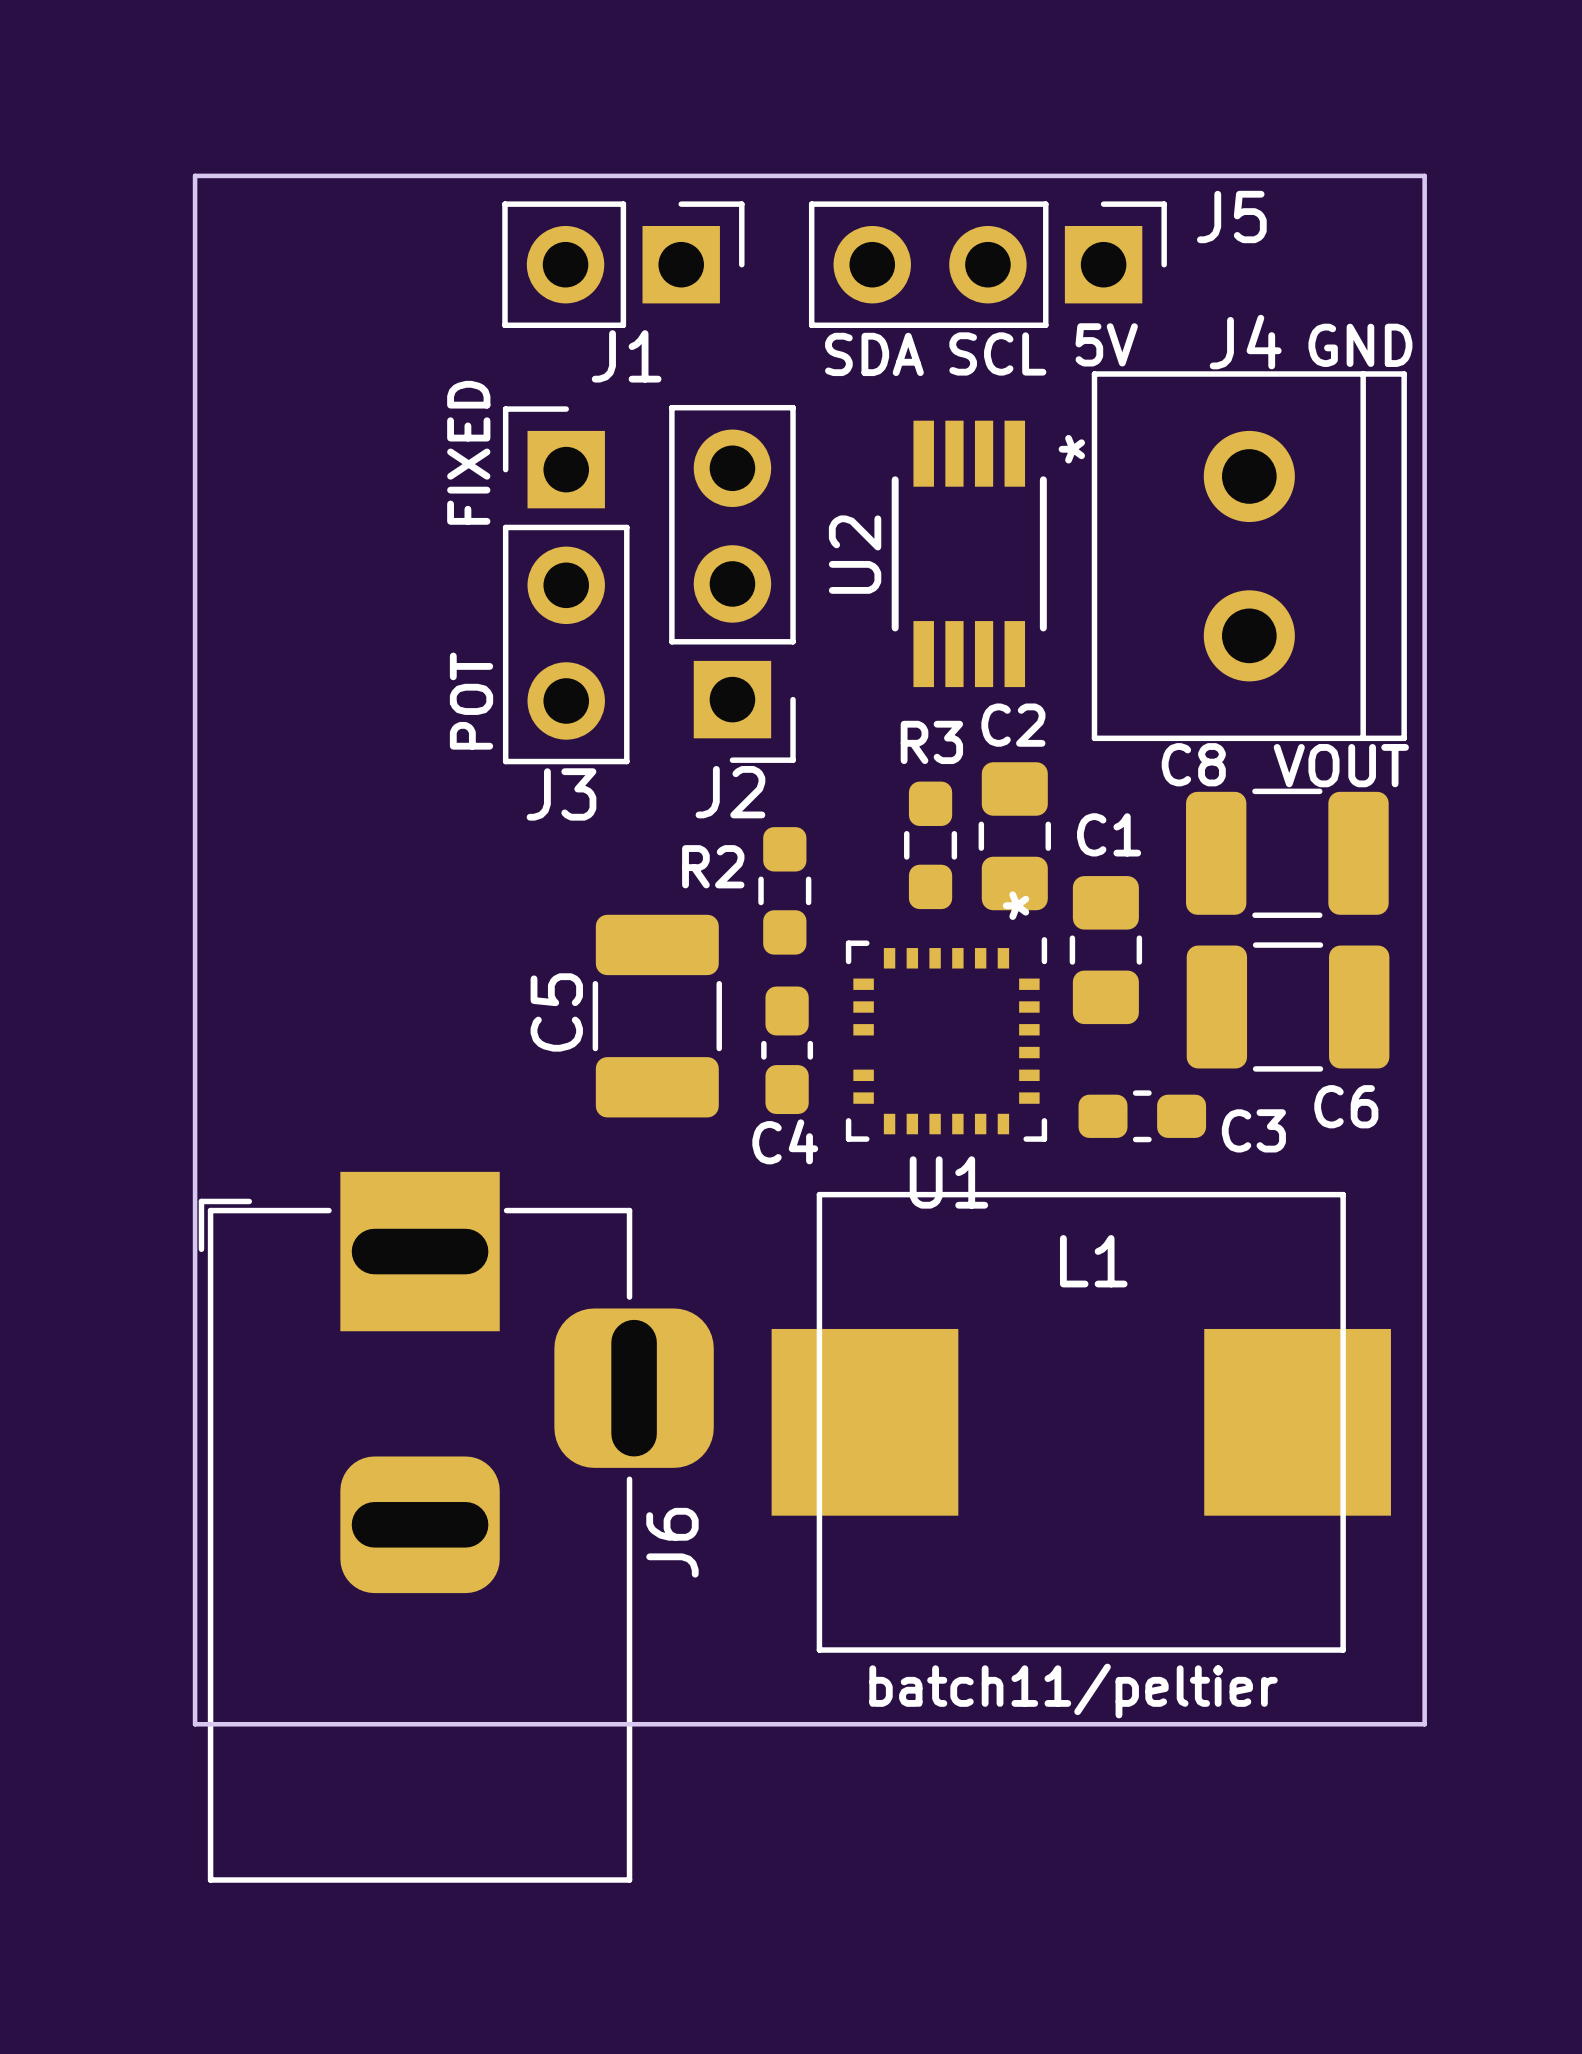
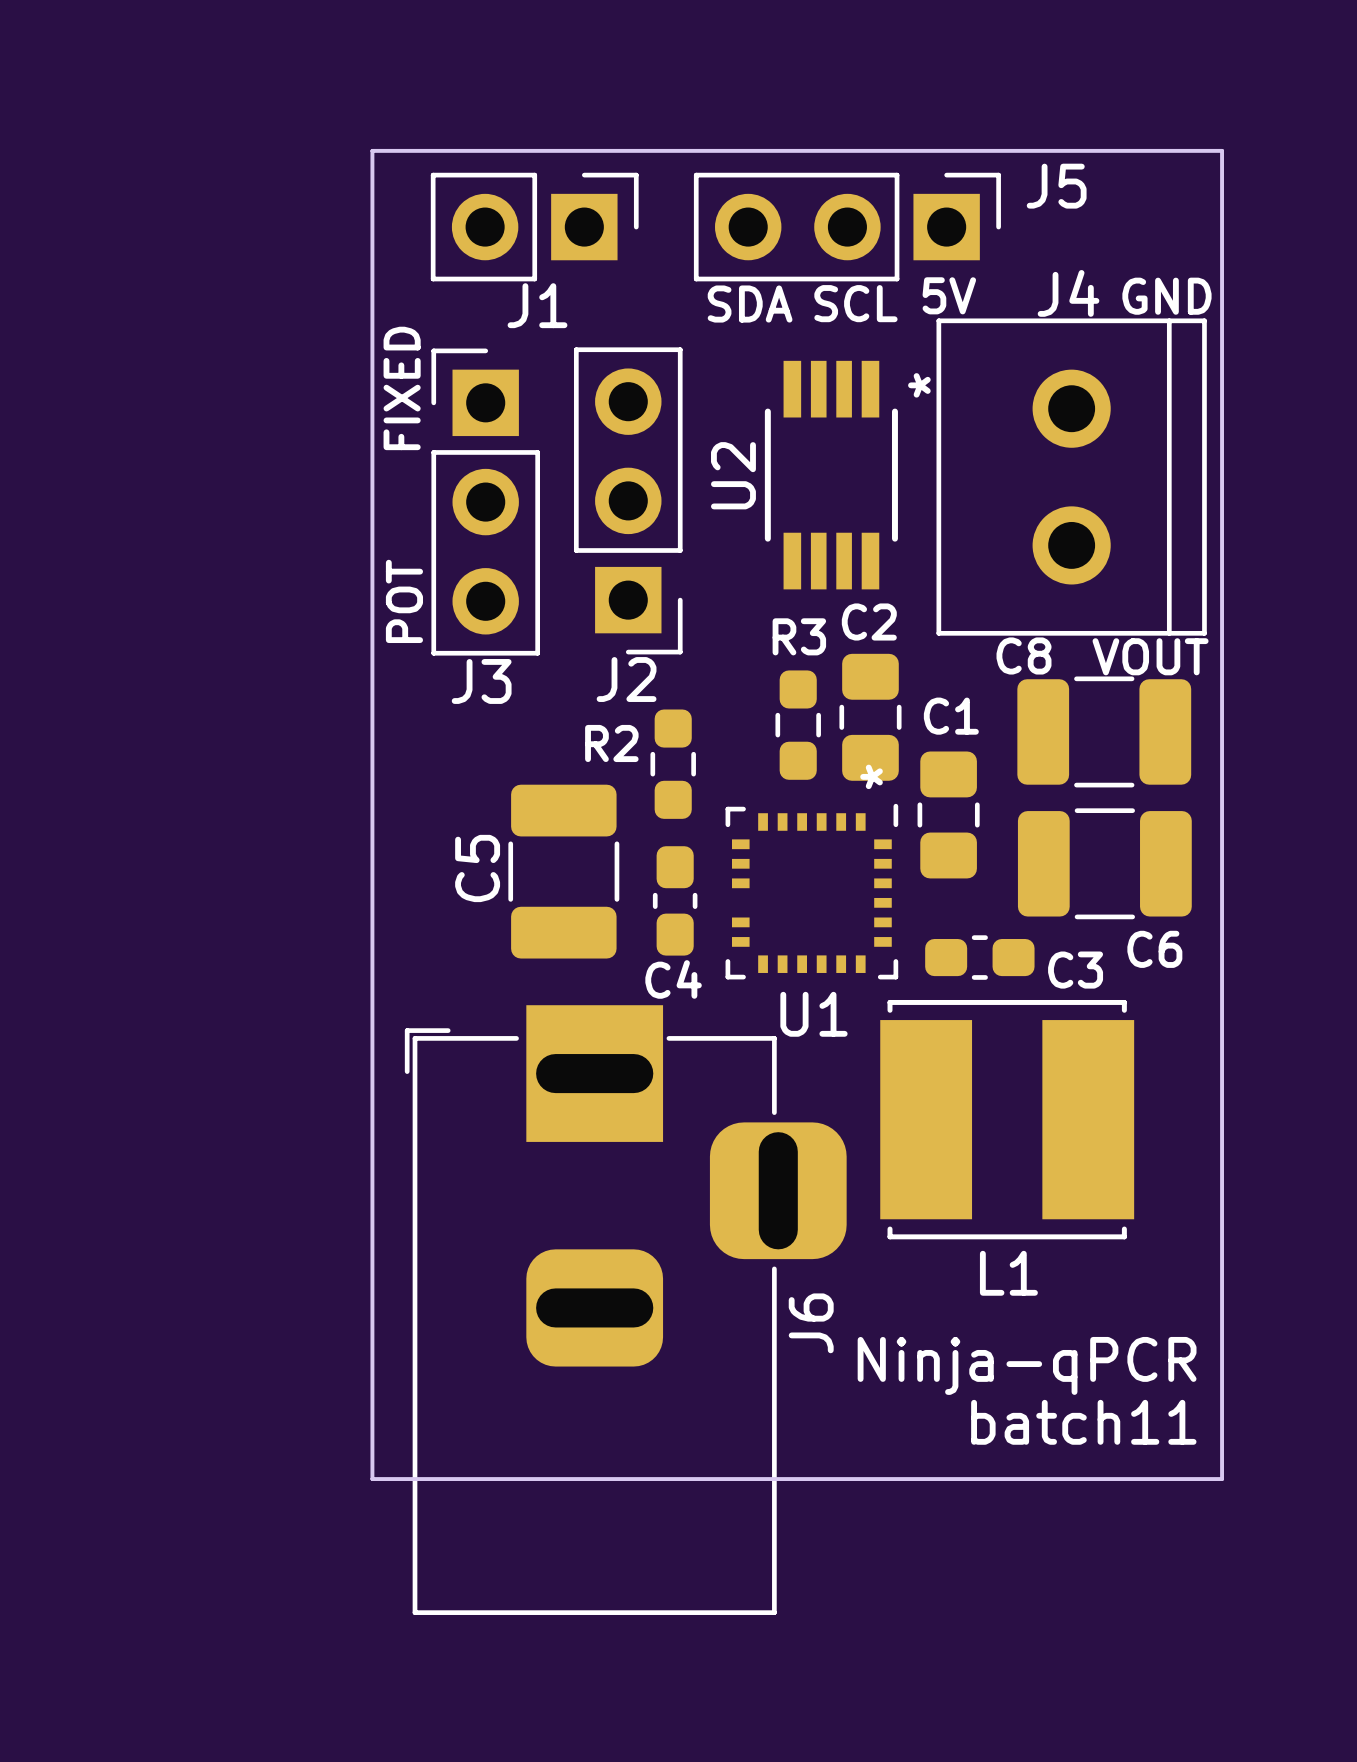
board edge: (434, 175) (195, 175) (195, 1724) (434, 1724) -> (372, 150) (372, 1479)
L1 footprint: [771, 1191, 1391, 1653] -> [880, 999, 1135, 1240]
L1 name position: L1 (1093, 1261) -> L1 (1008, 1273)
J6 position: (456, 1527) -> (625, 1310)
text: none -> Ninja-qPCR (1027, 1365)
text: batch11/peltier (1073, 1691) -> batch11 (1083, 1422)

